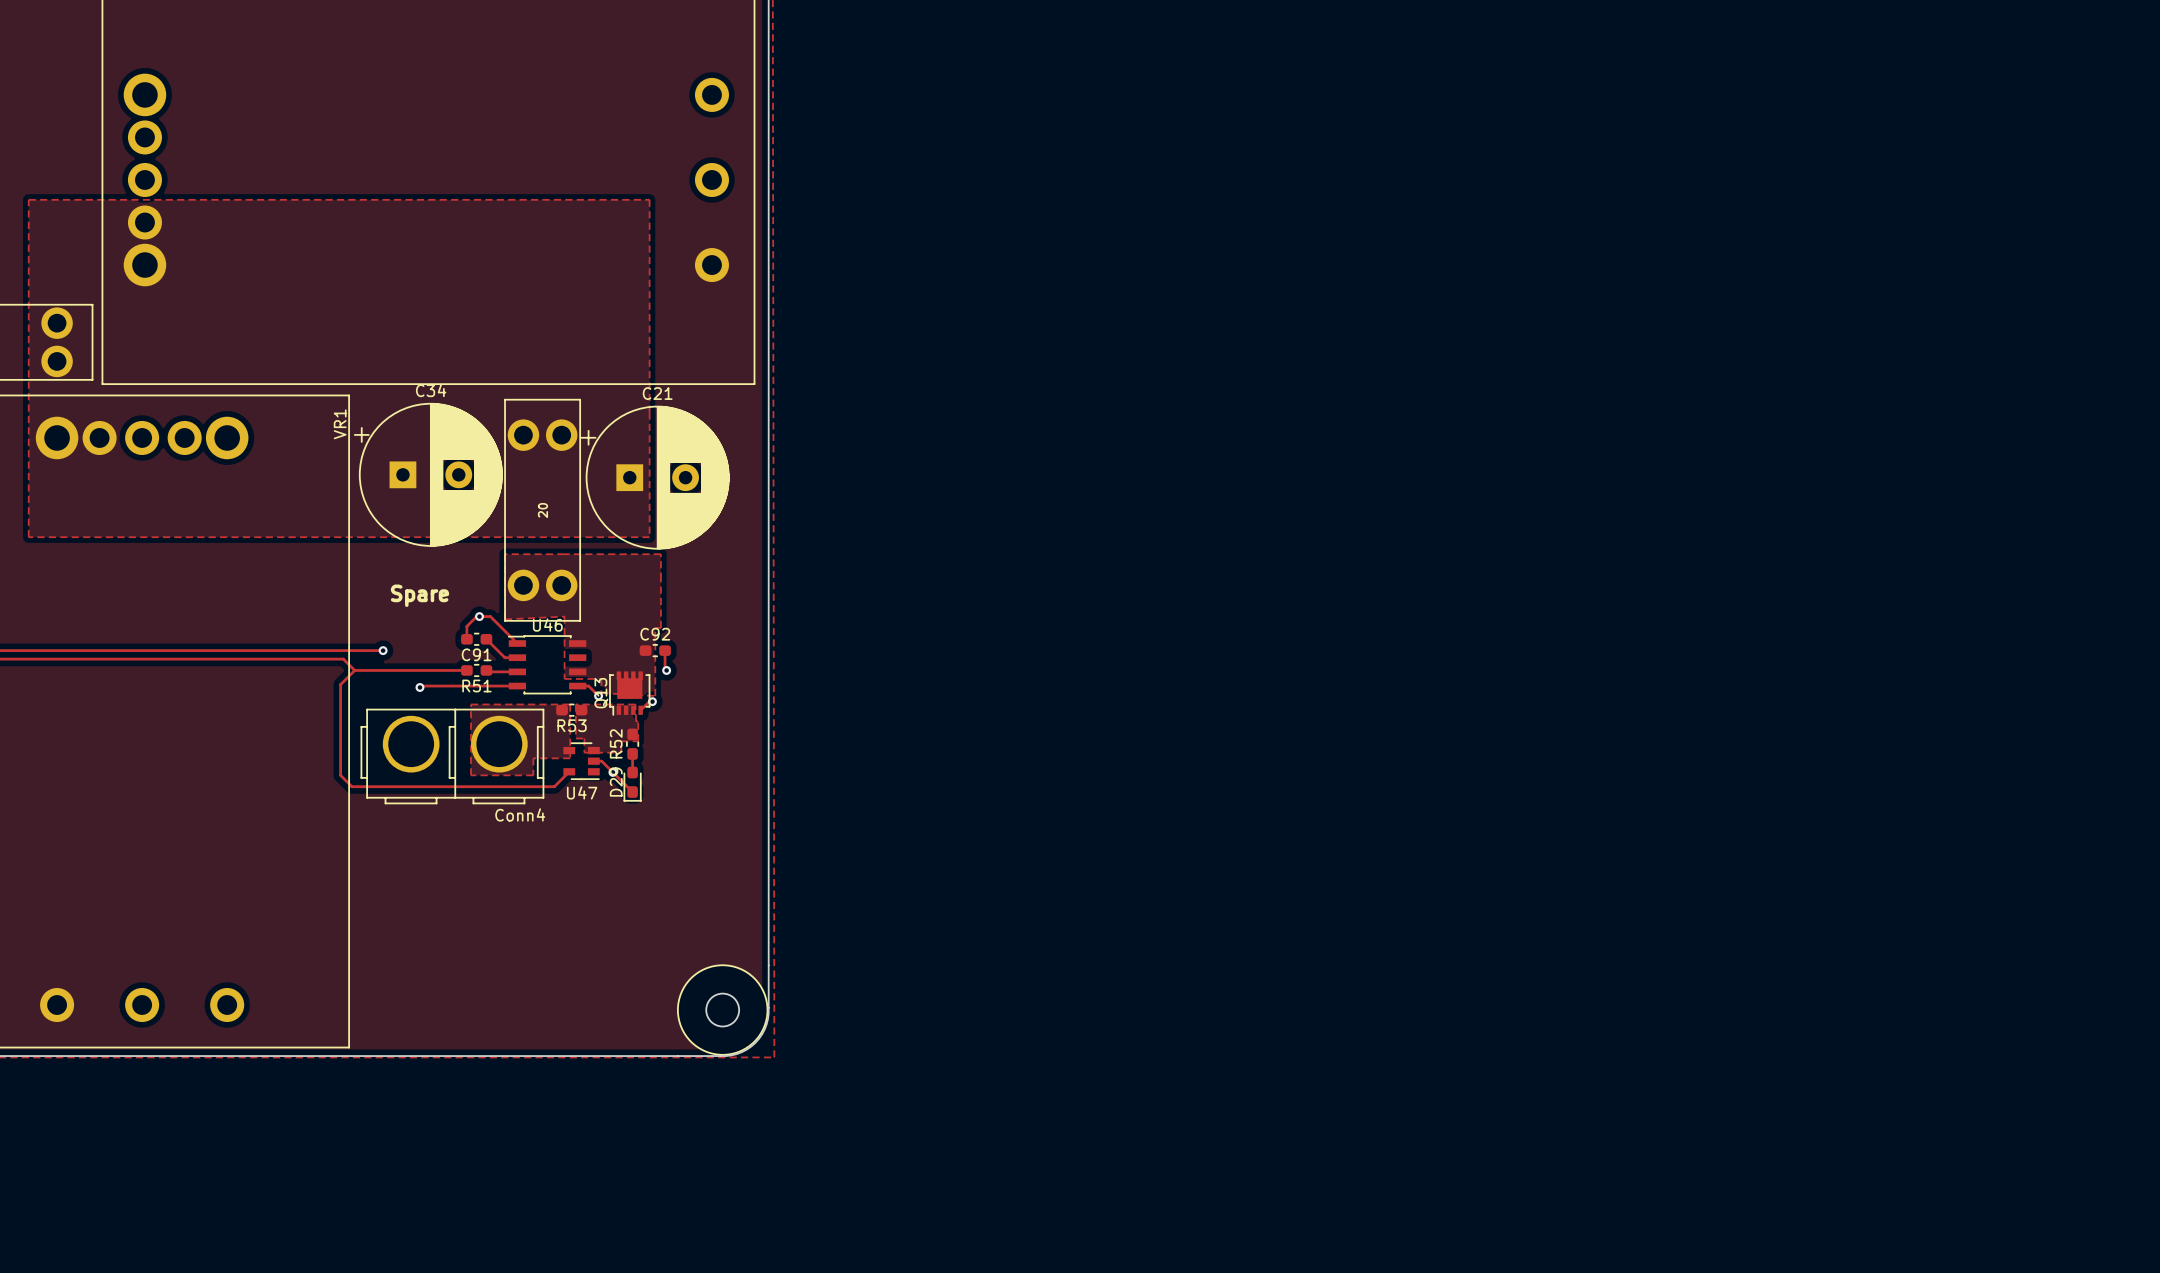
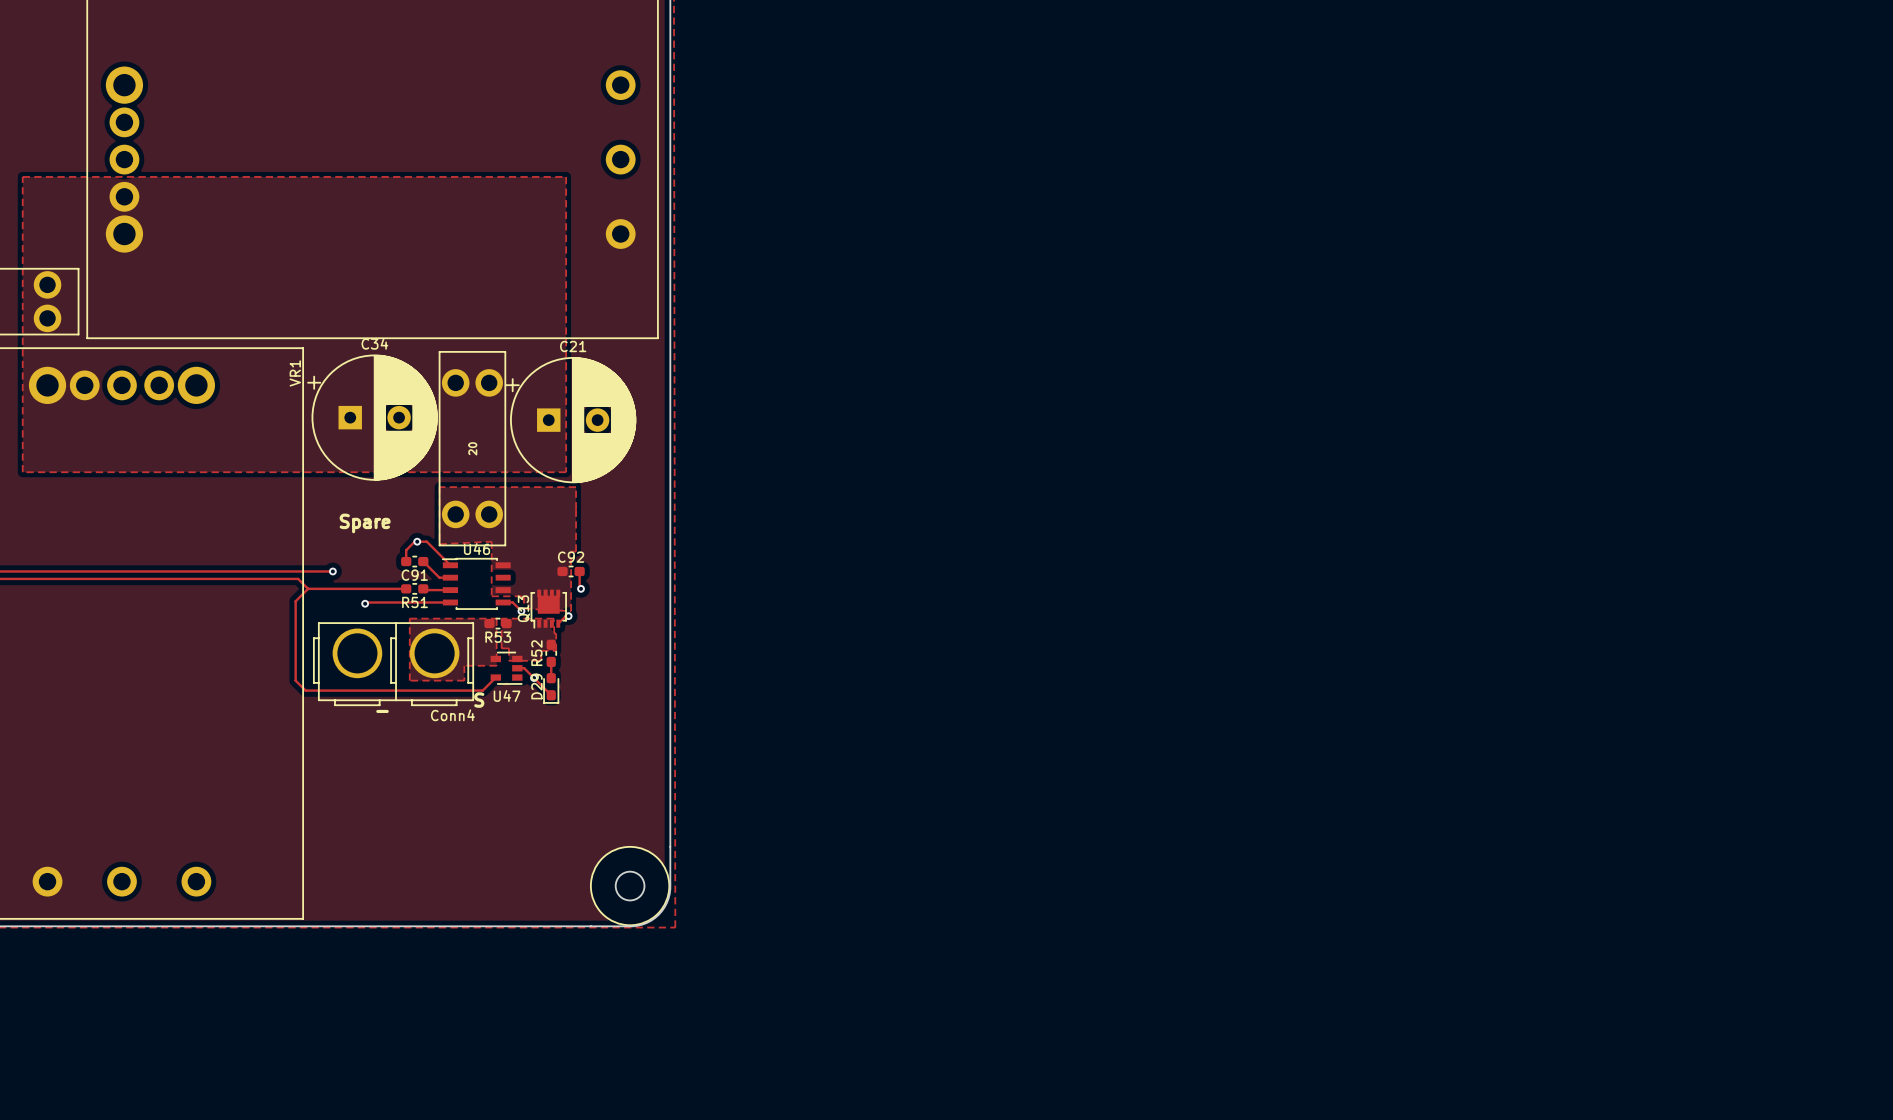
text: none -> S (479, 700)
text: none -> - (382, 711)

